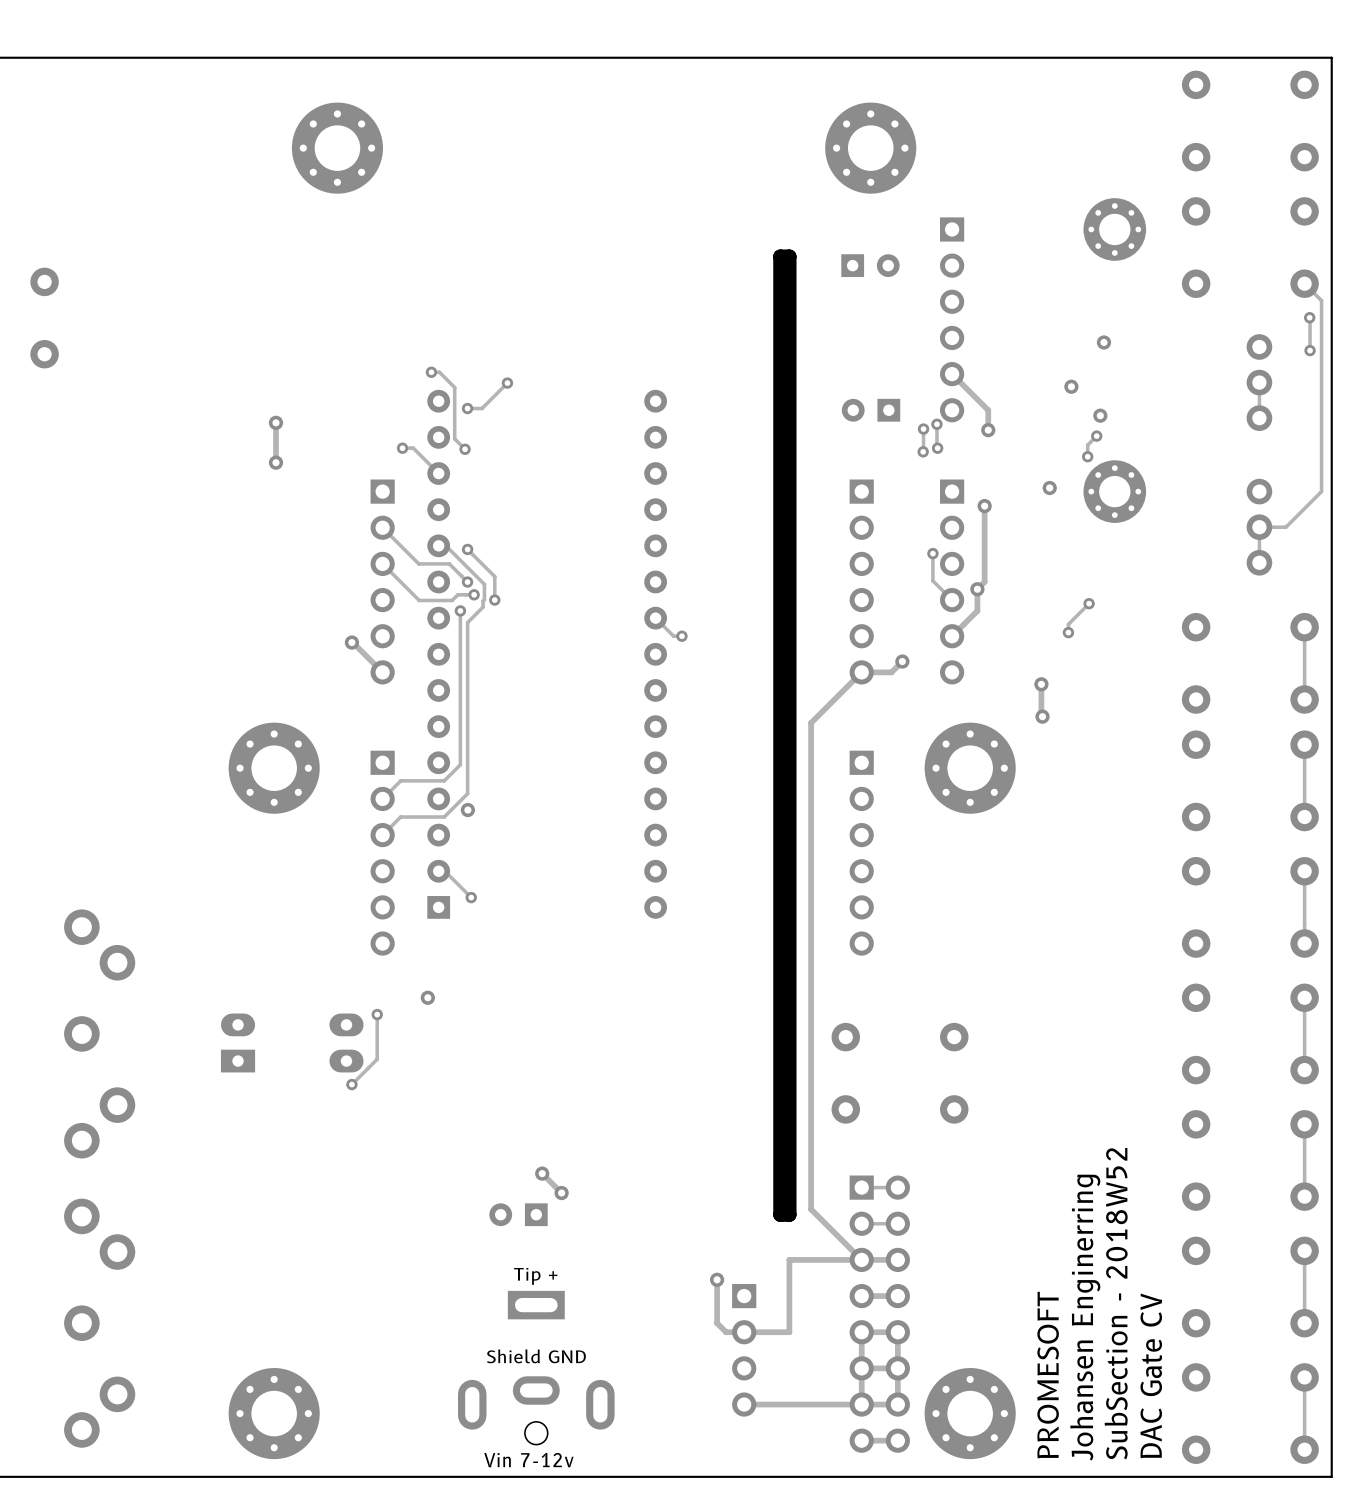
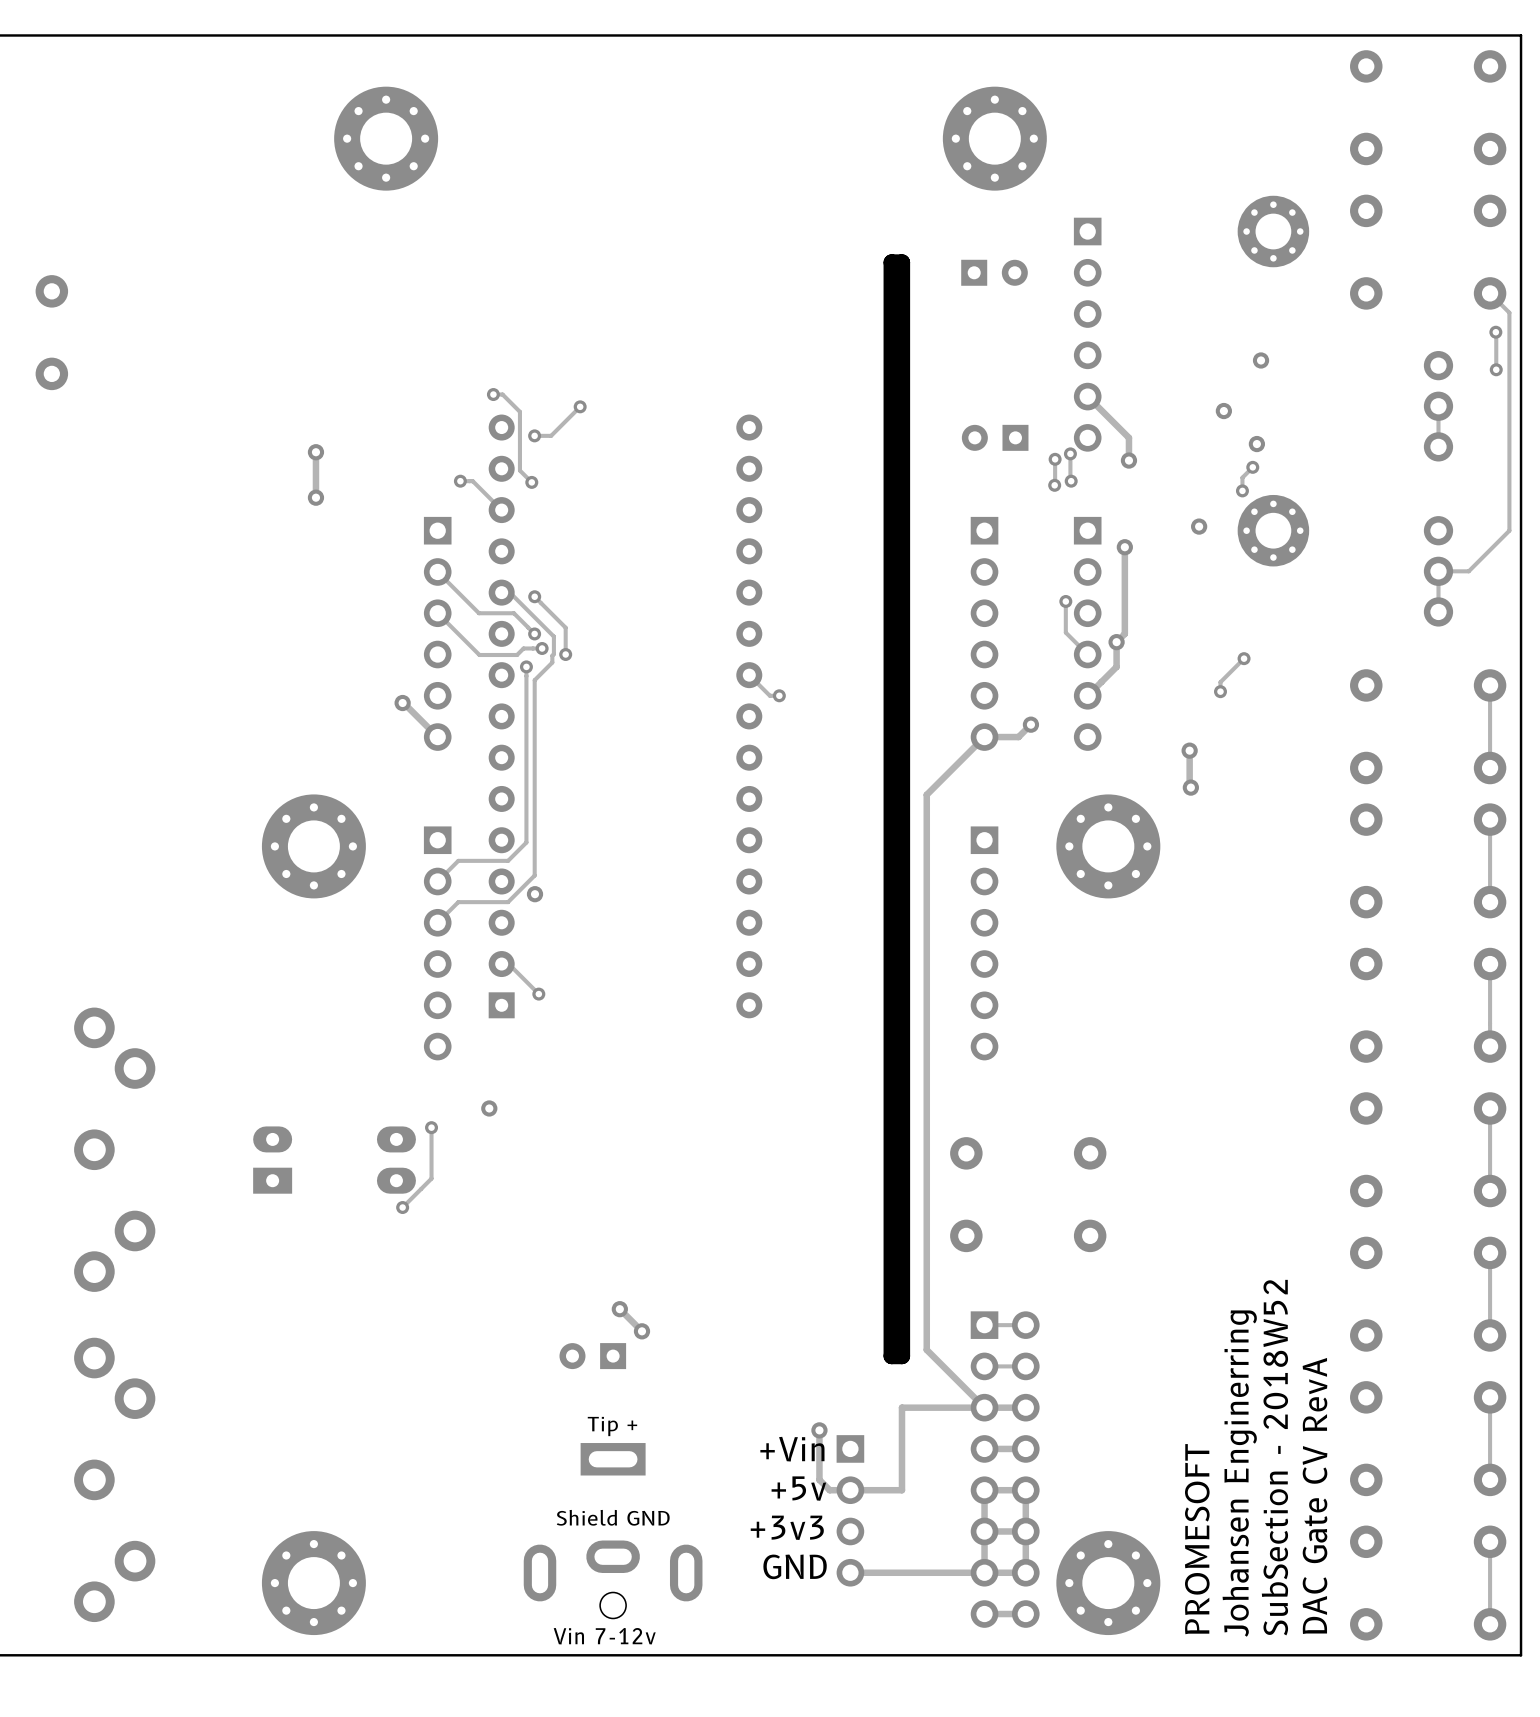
text: none -> +Vin (792, 1449)
text: none -> +5v (798, 1488)
text: none -> +3v3 (787, 1527)
text: DAC Gate CV (1151, 1375) -> DAC Gate CV RevA (1315, 1495)
text: none -> GND (795, 1566)

